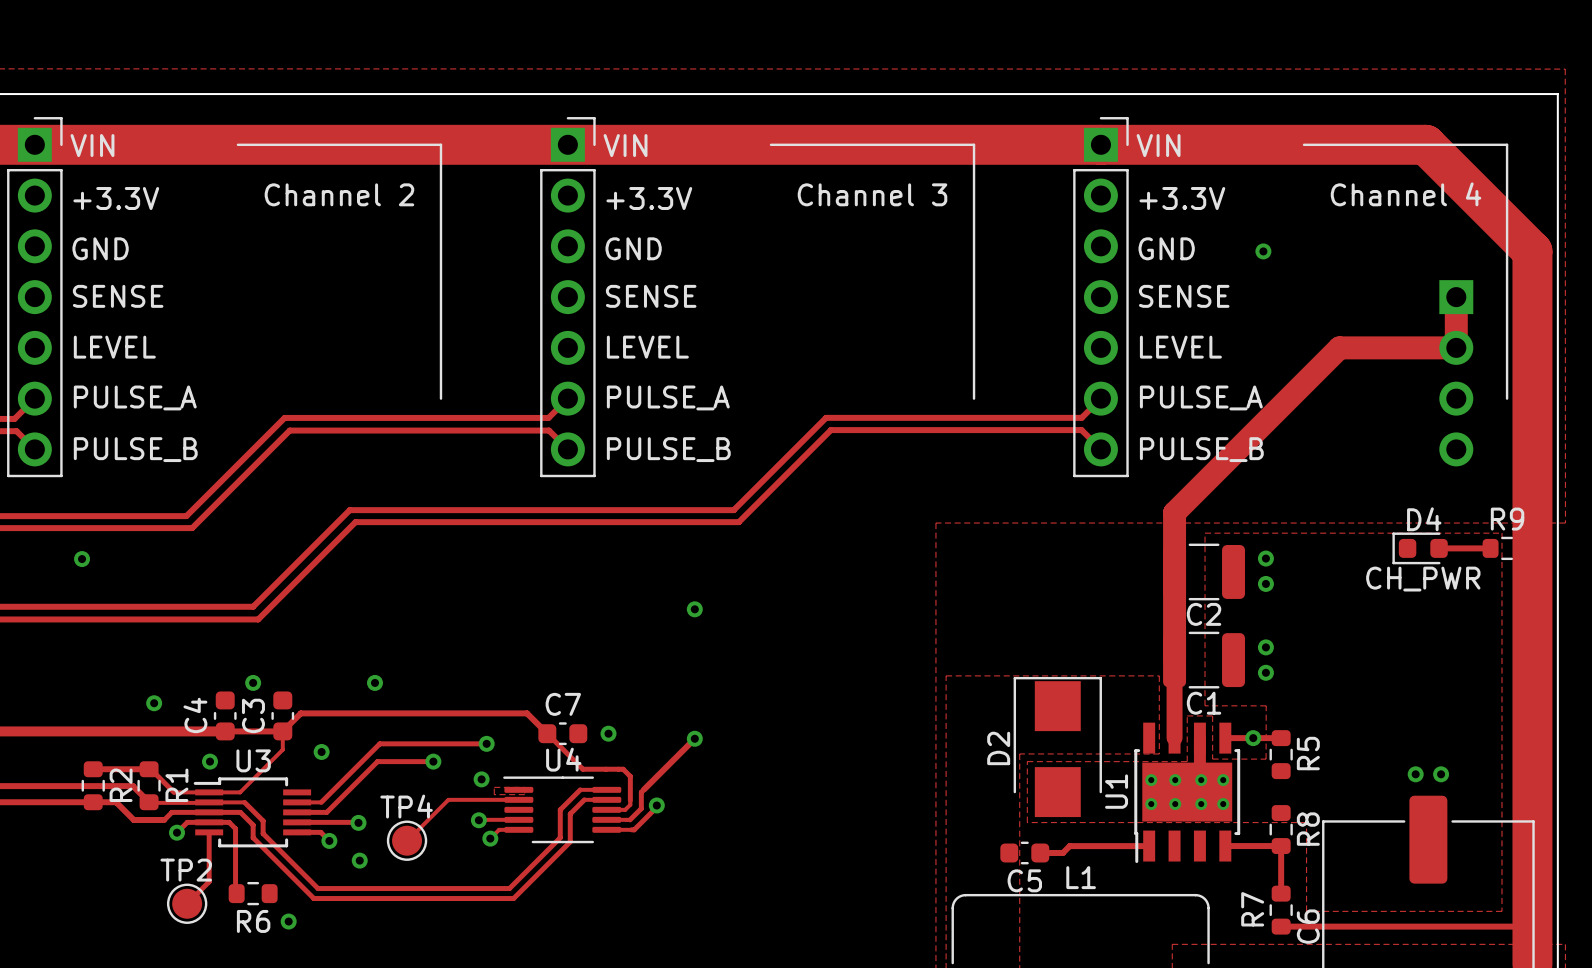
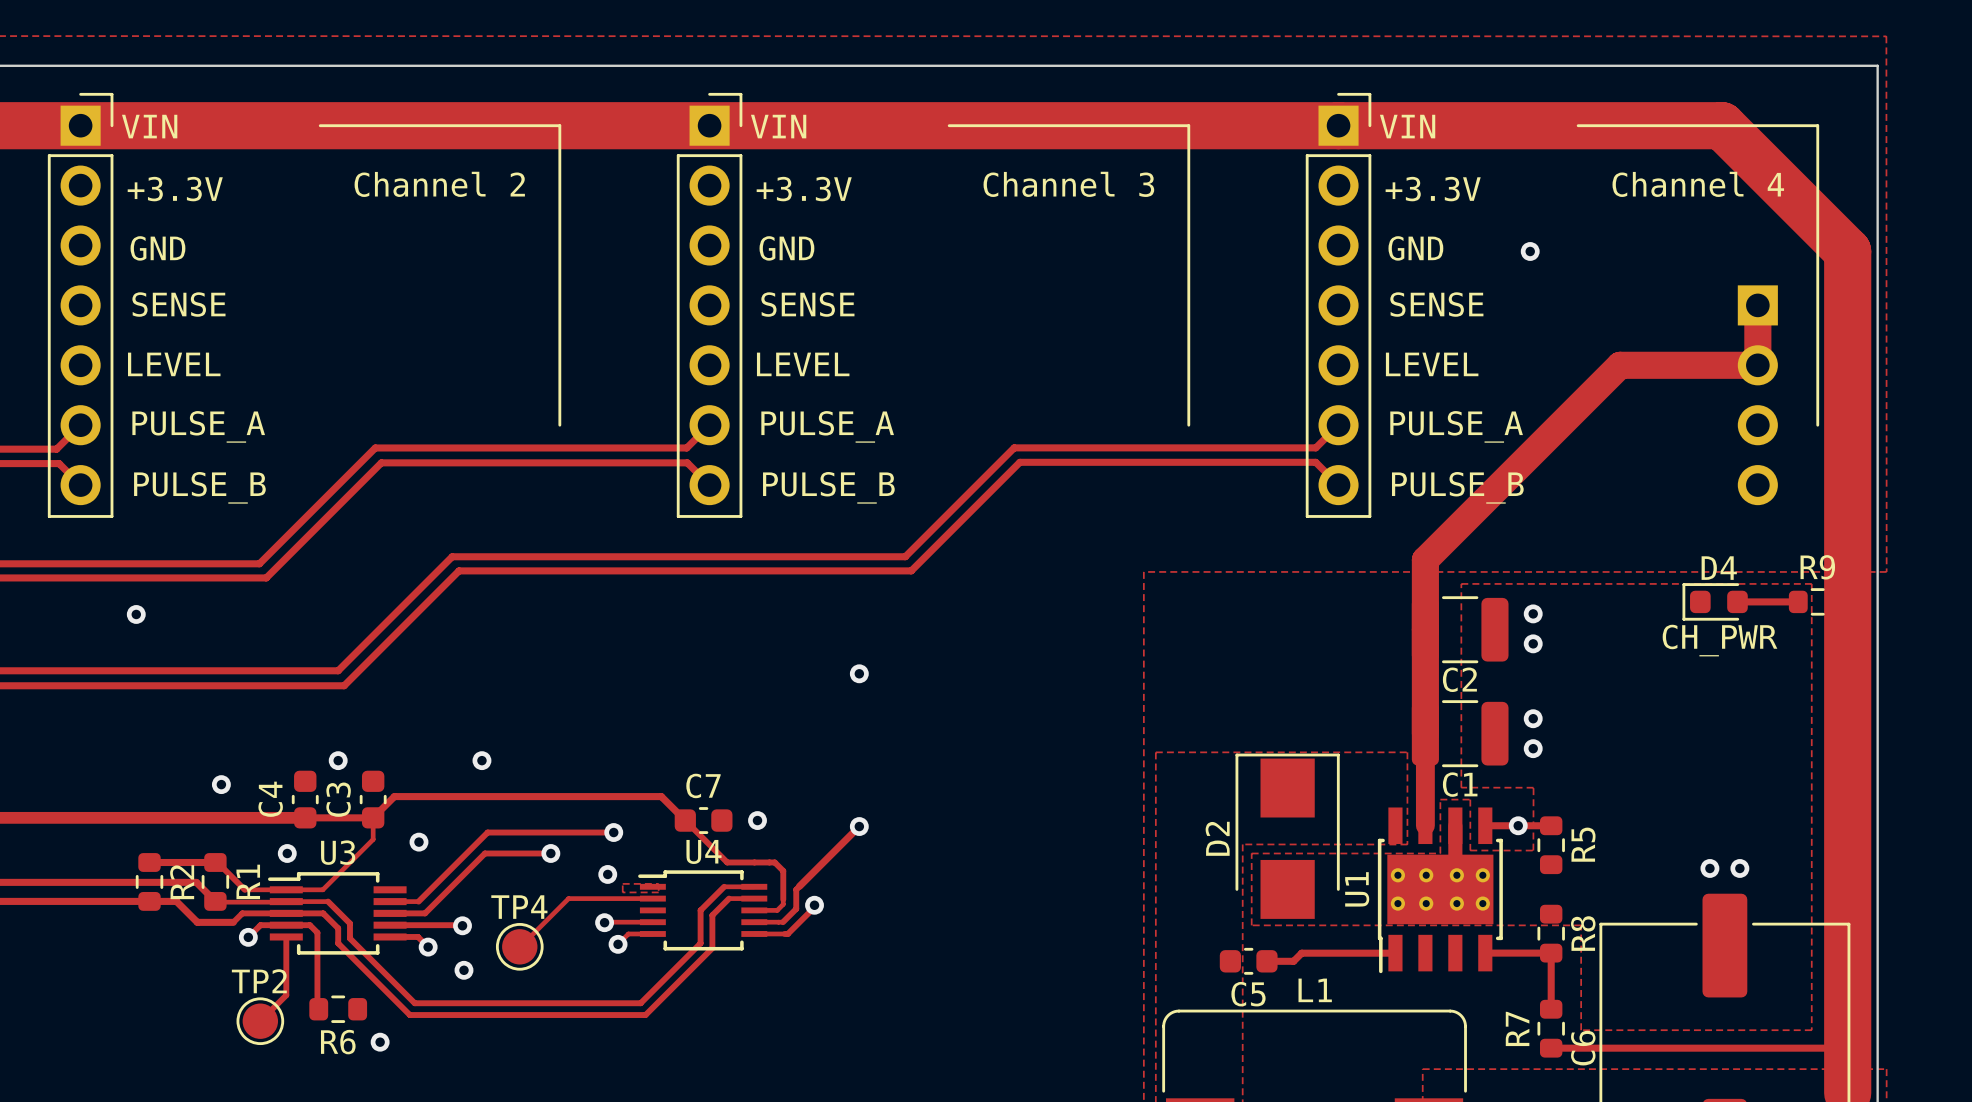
U4 footprint: [503, 776, 622, 844] -> [638, 870, 768, 951]

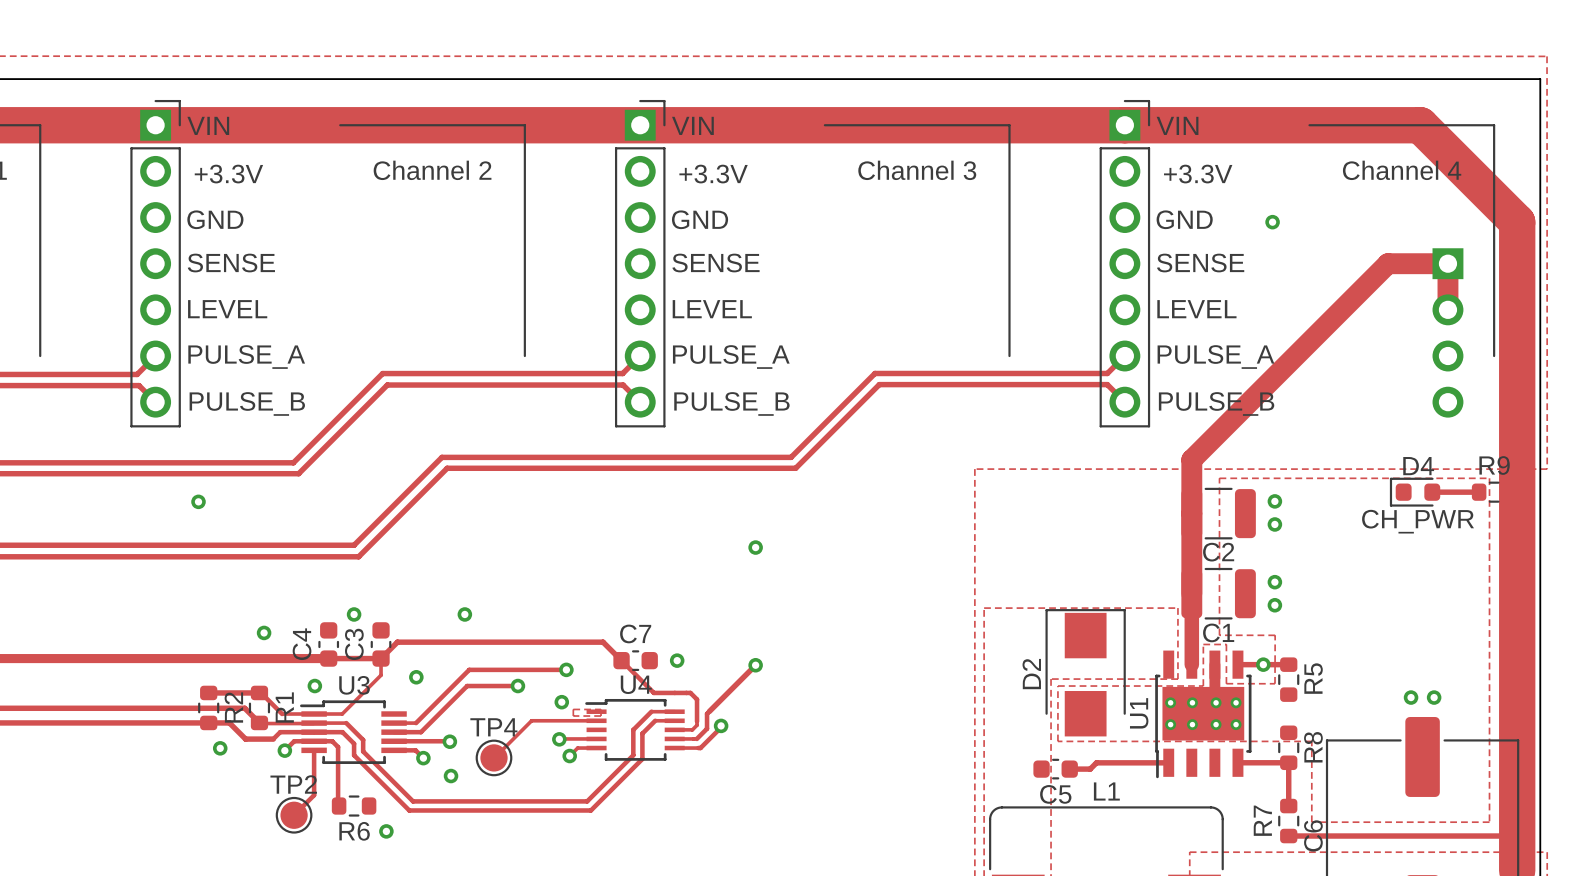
track: (1620, 365) (1757, 365) -> (1341, 309) (1387, 263) (1447, 263)
via: none -> (220, 748)

